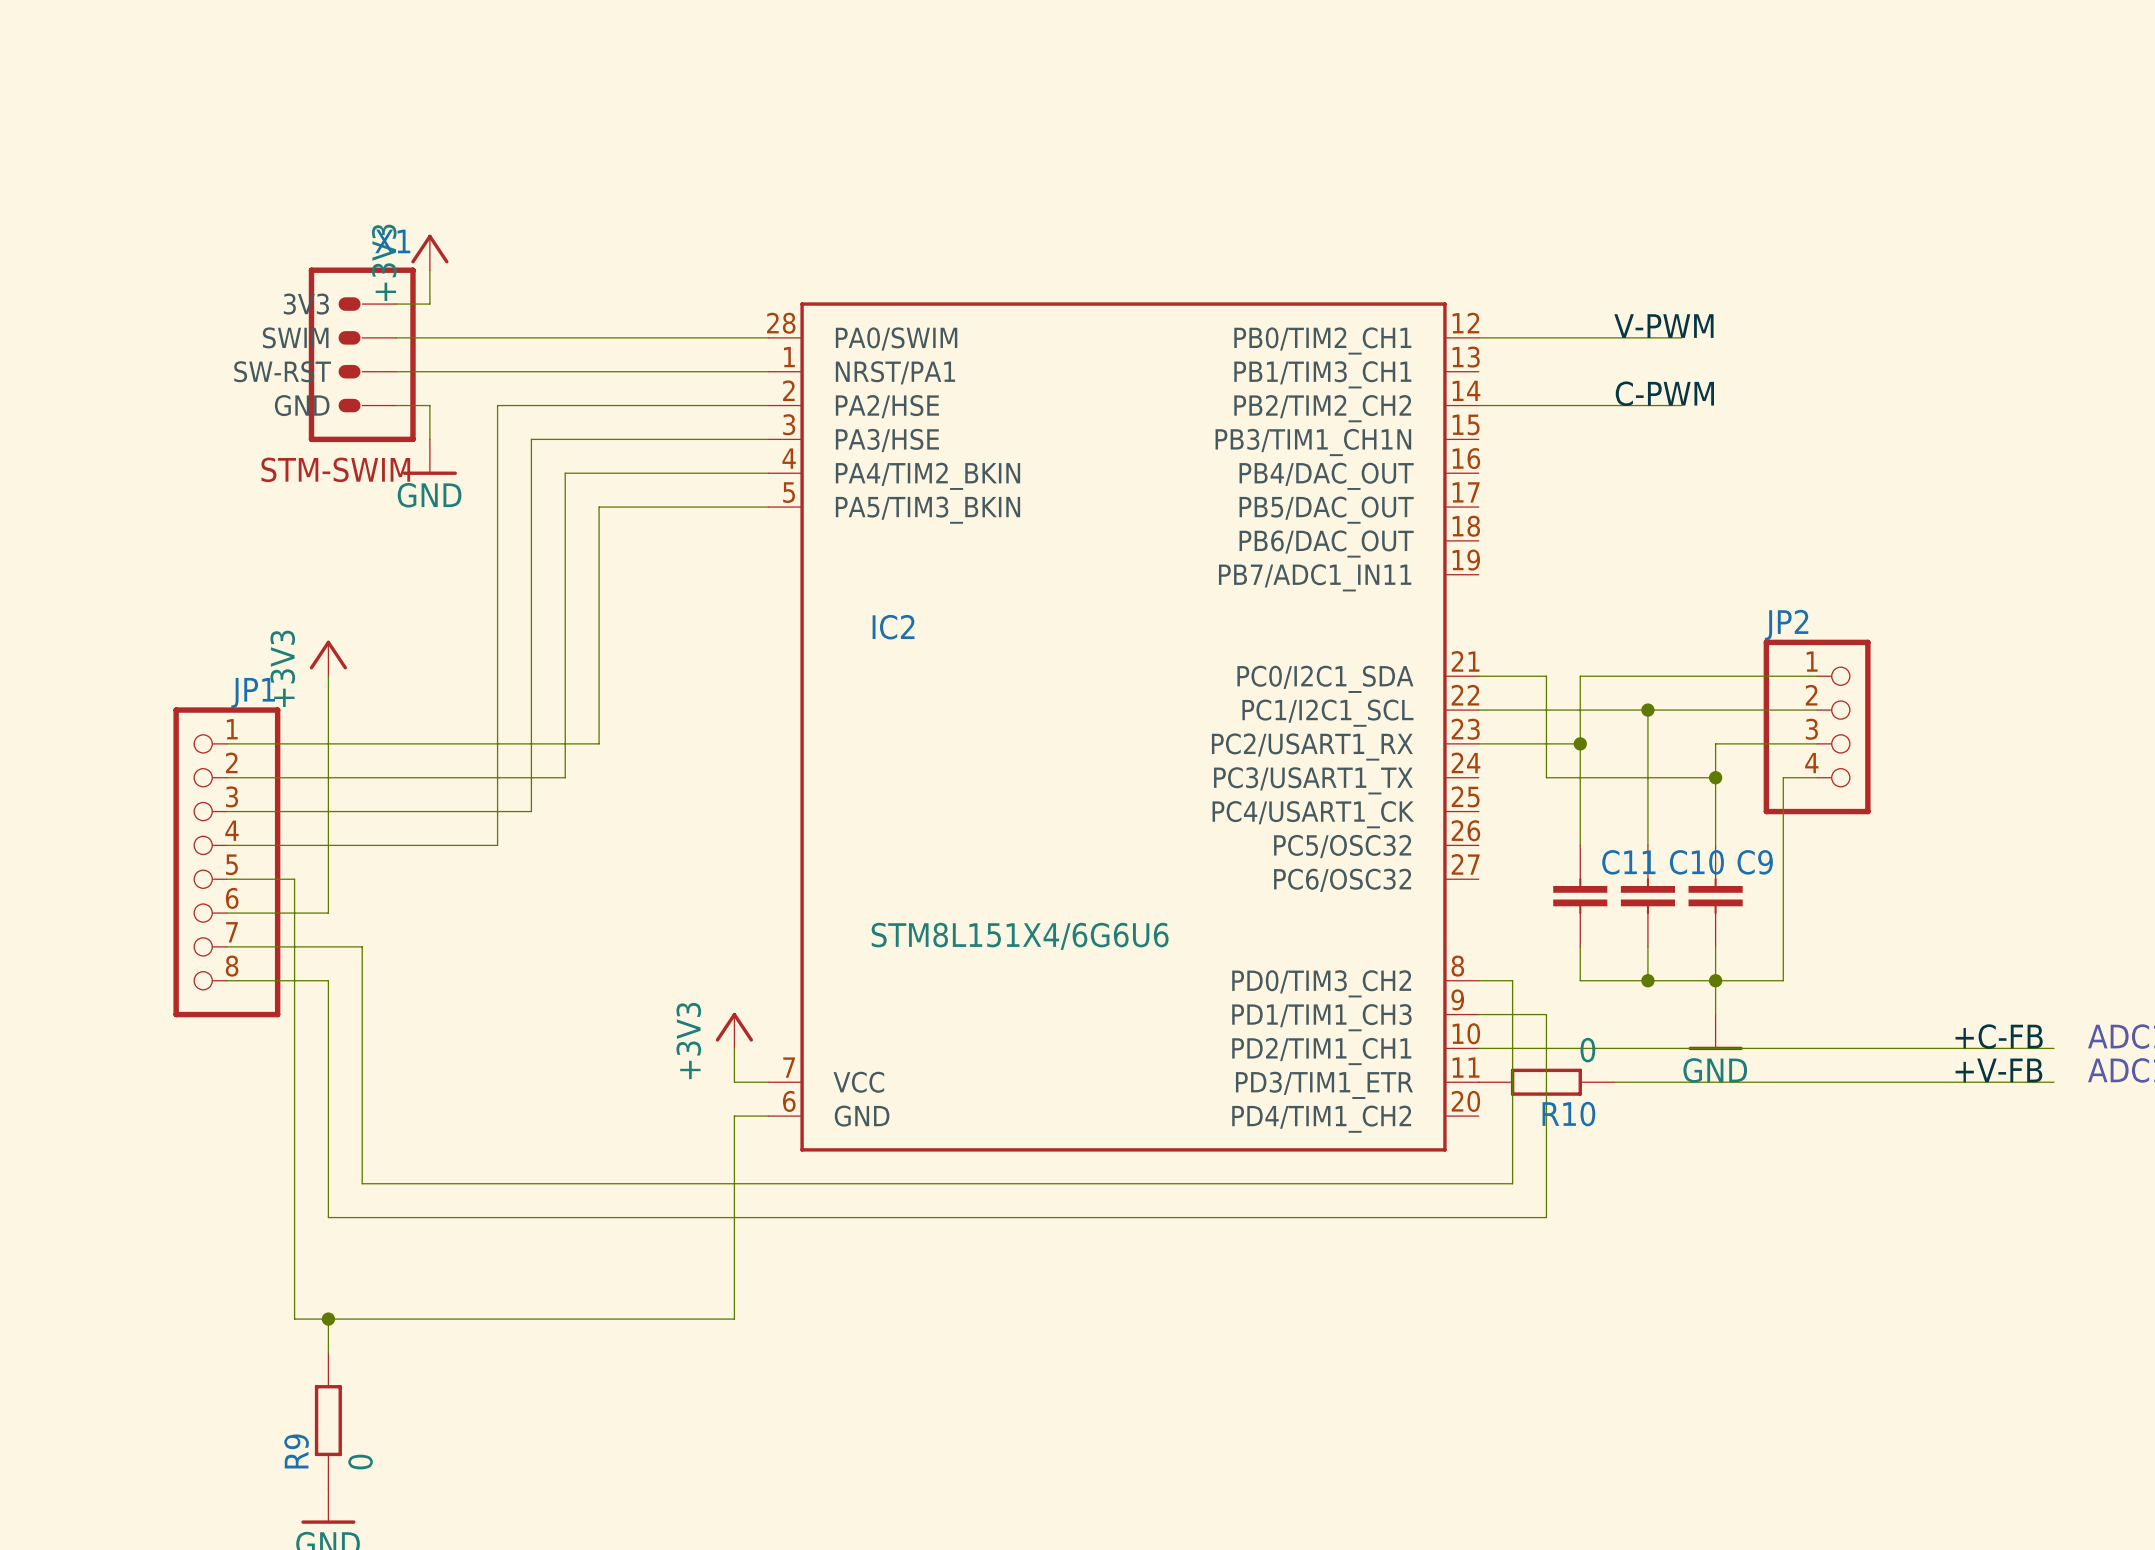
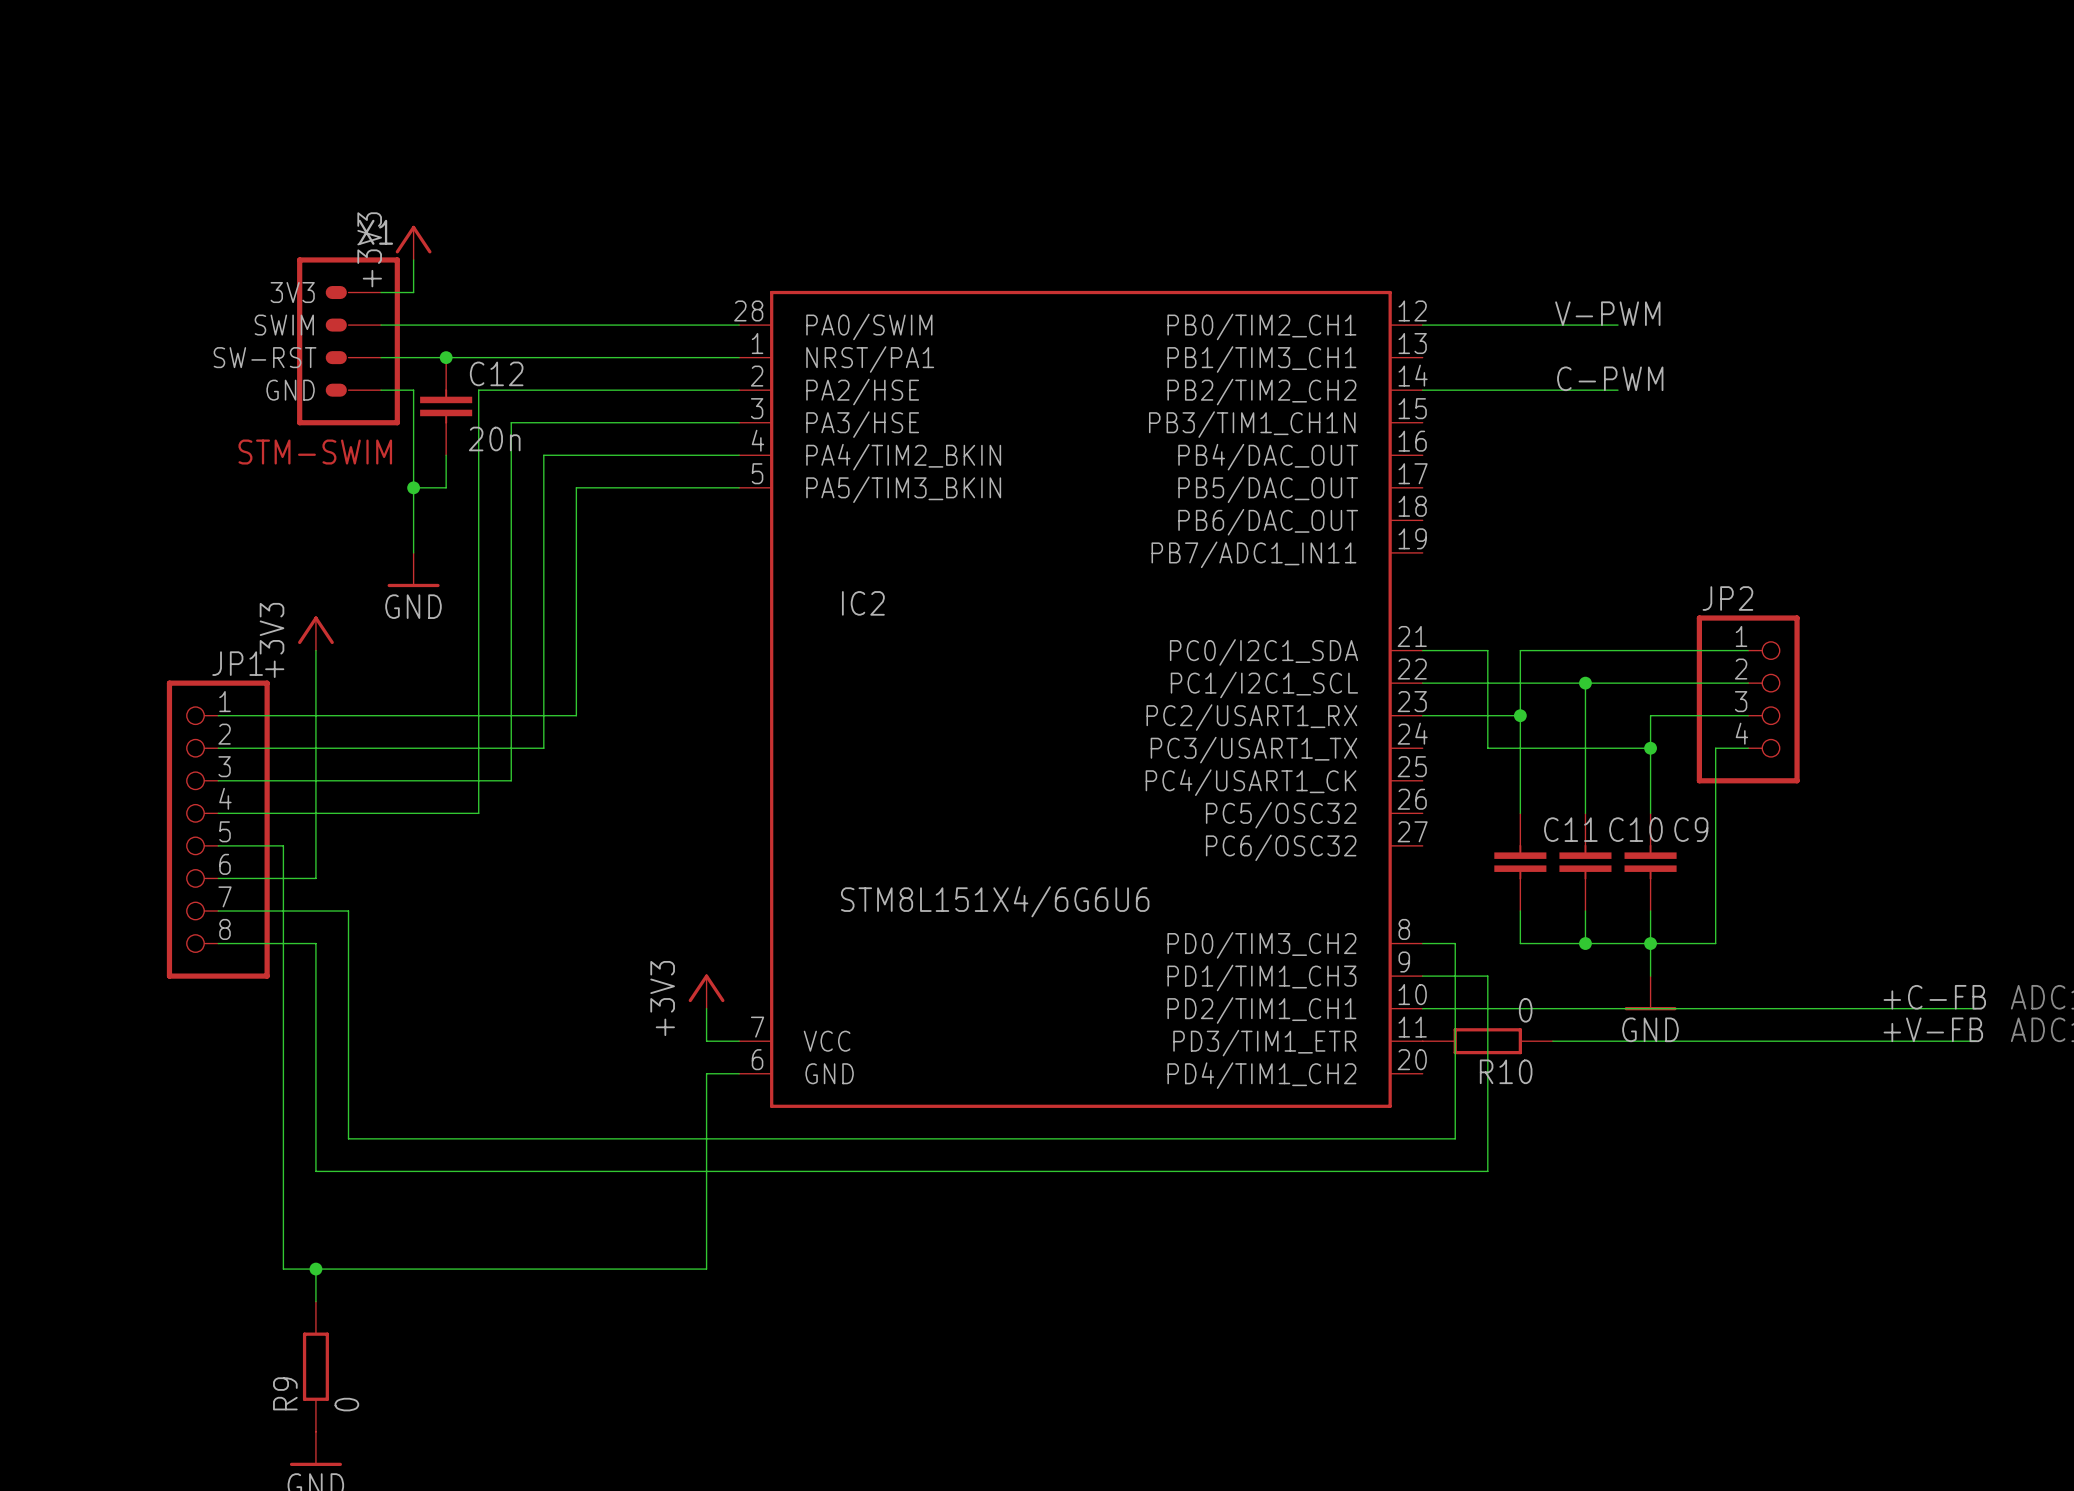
junction: none -> (446, 357)
C12: none -> 20n (446, 406)
wire: none -> (413, 422) (413, 552)
power symbol position: GND (429, 457) -> GND (413, 570)
wire: none -> (446, 455) (446, 487) (413, 487)
junction: none -> (413, 487)

